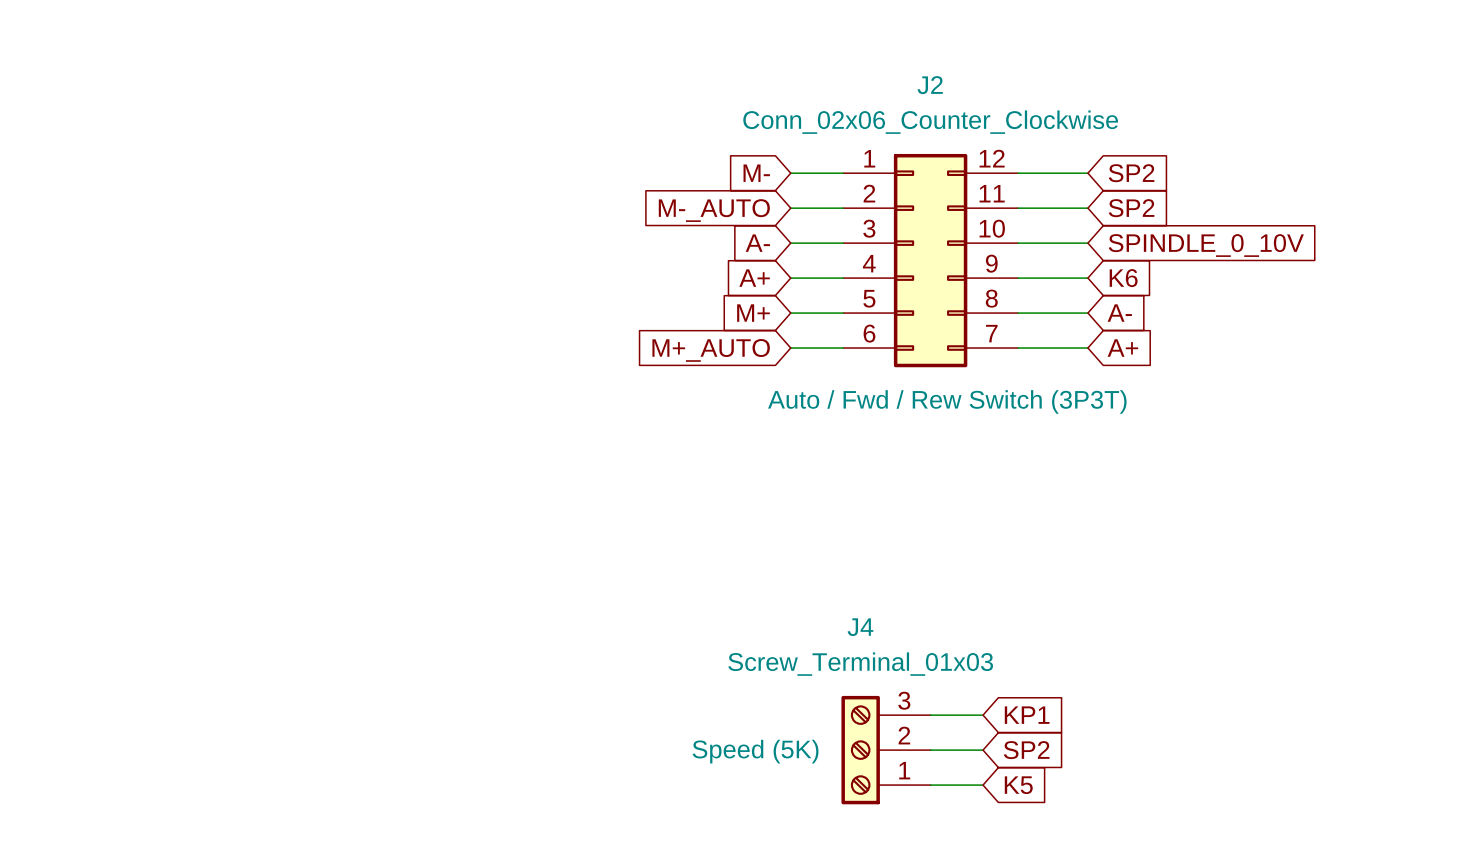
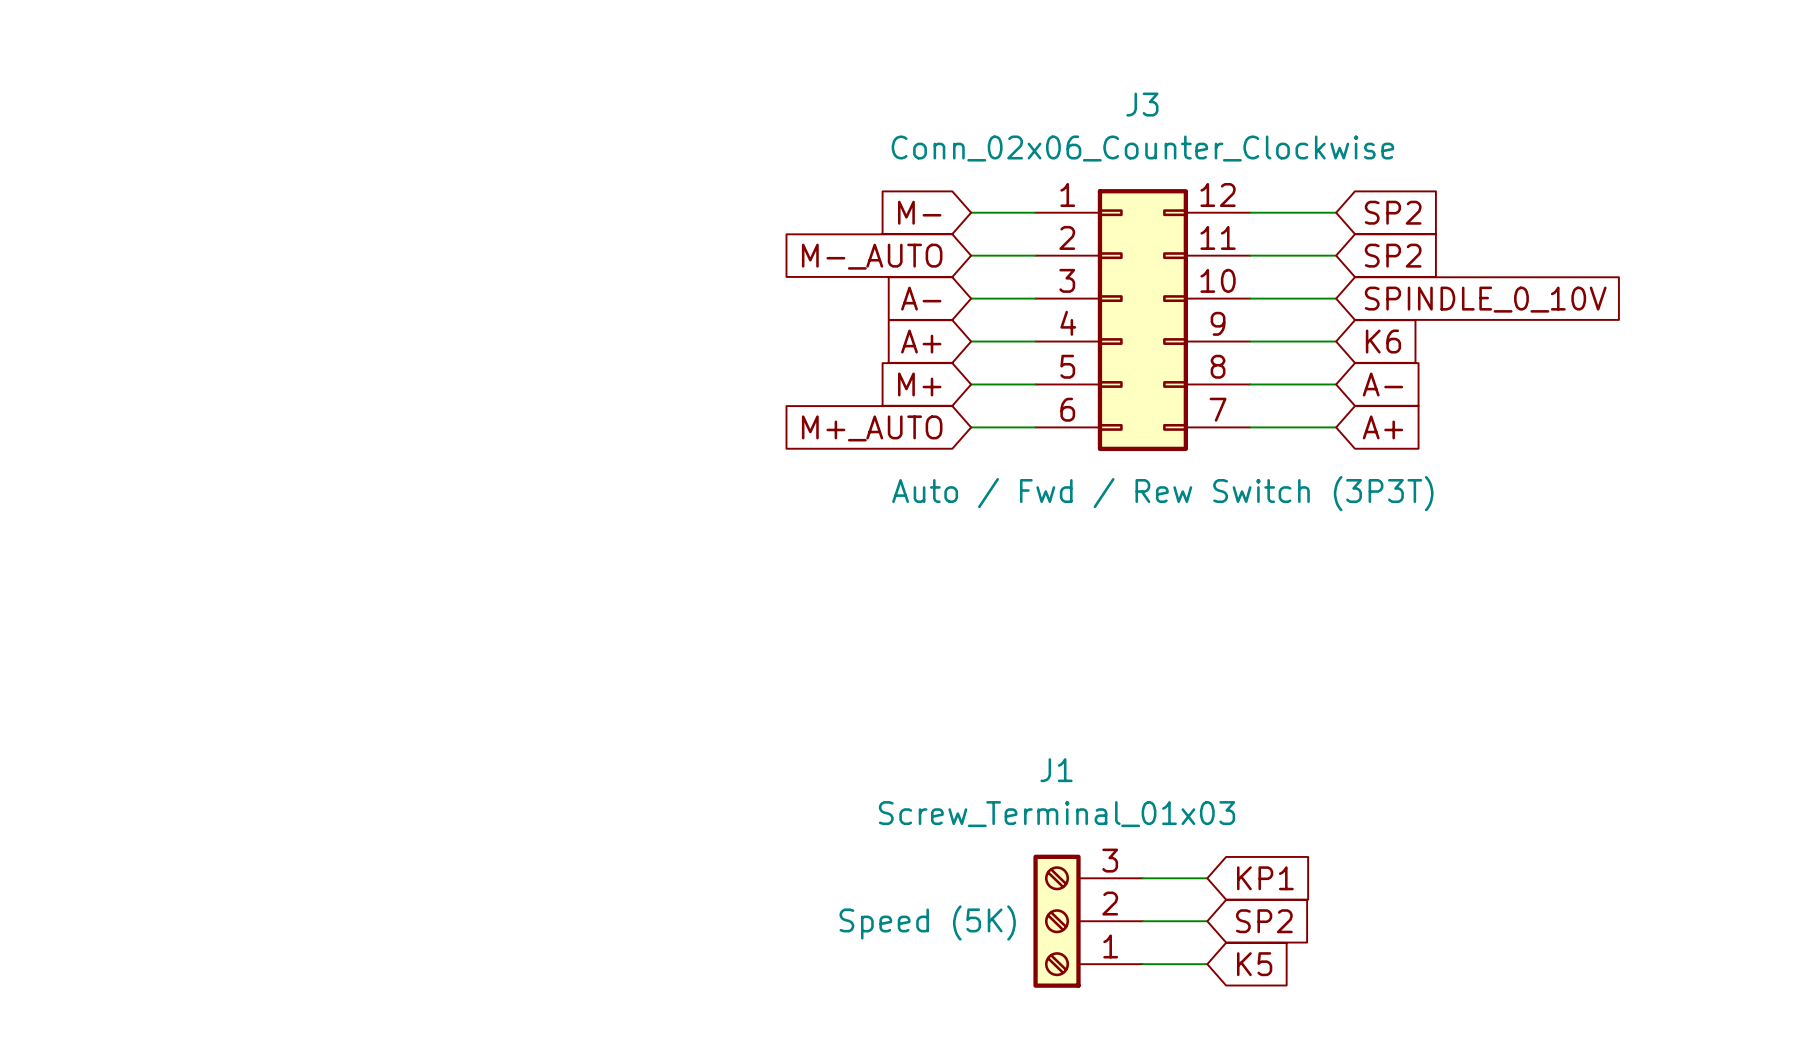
J2 name: J2 (930, 85) -> J3 (1142, 104)
J4 name: J4 (860, 627) -> J1 (1056, 770)

